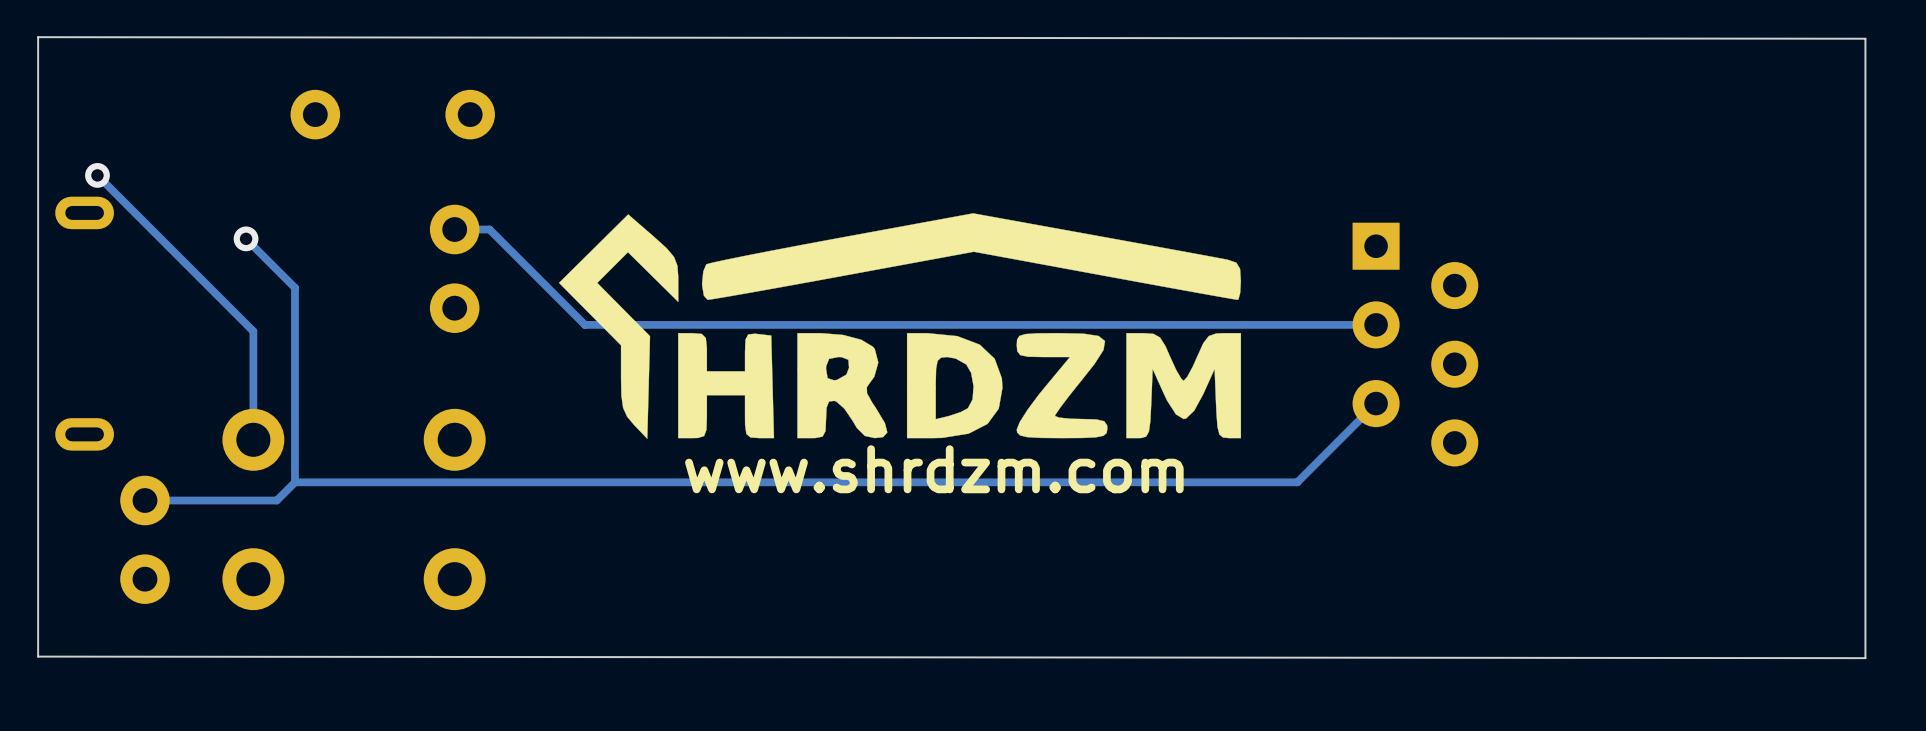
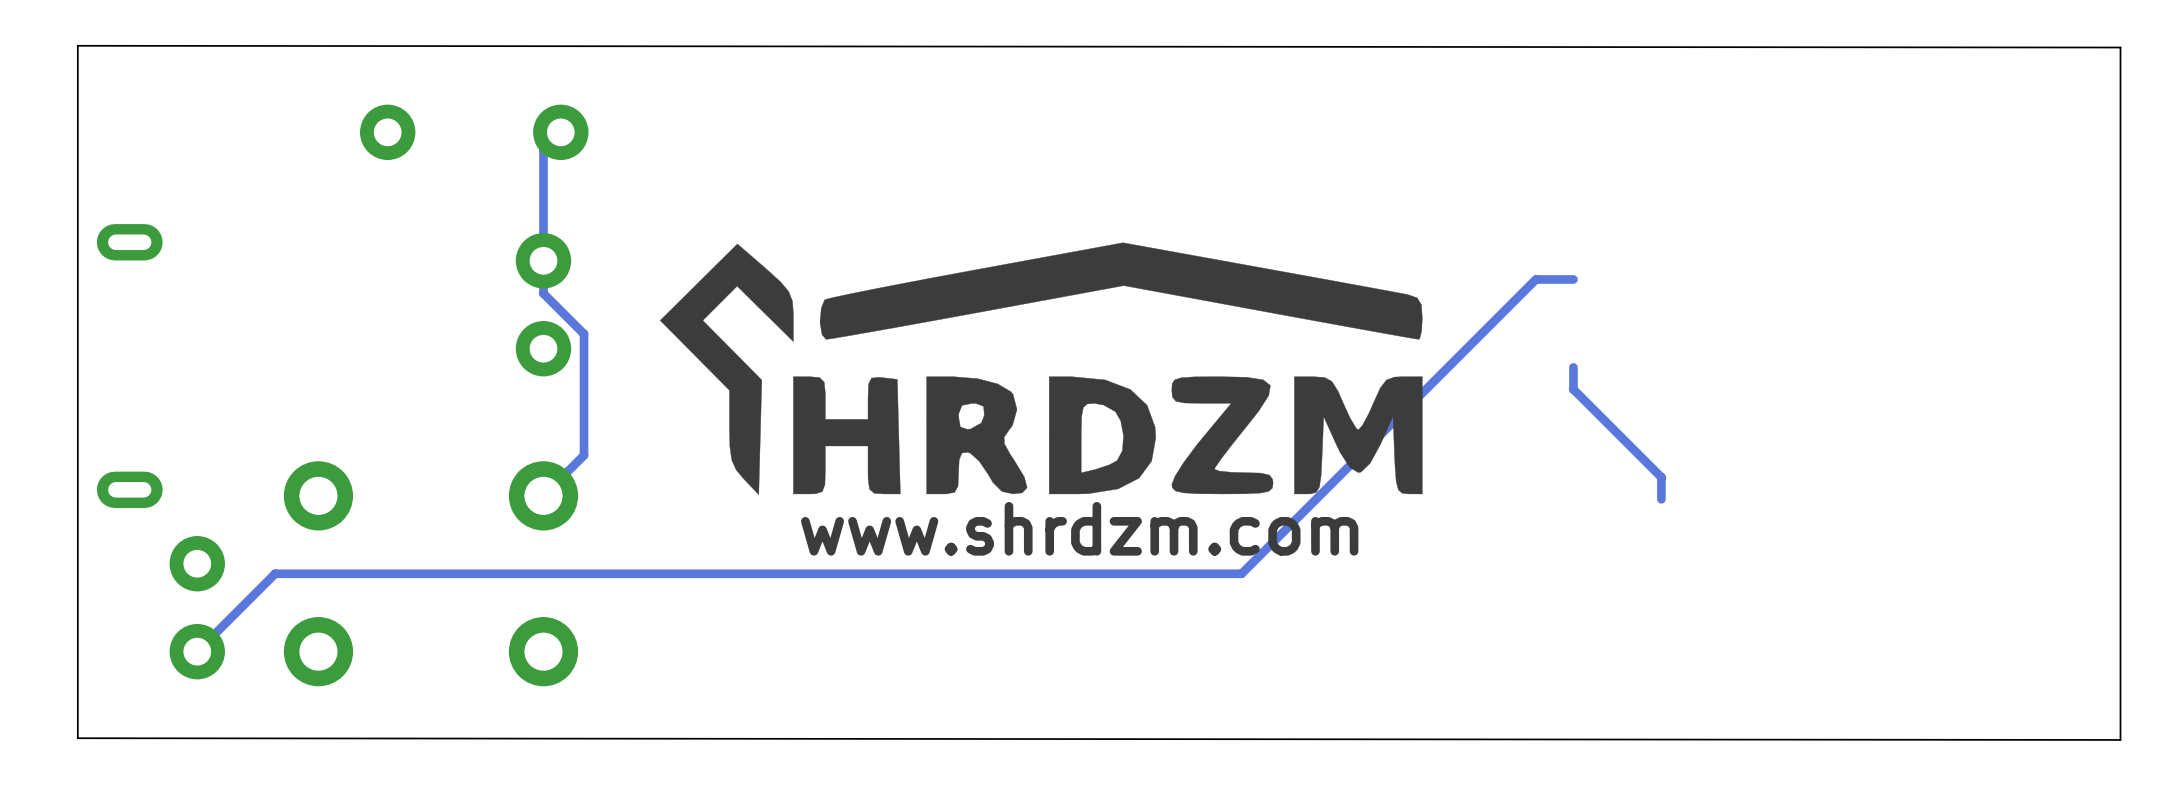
track: none -> (560, 132) (543, 149) (543, 293) (584, 334) (584, 455) (543, 495)
track: (97, 175) (253, 331) (253, 439) -> none
via: (97, 175) -> none
track: (454, 229) (489, 229) (584, 324) (1376, 324) -> (1661, 499) (1661, 477) (1573, 389) (1573, 367)
track: (246, 238) (294, 287) (294, 482) -> none
via: (246, 238) -> none
track: none -> (1573, 279) (1535, 279) (1241, 573) (275, 573) (197, 651)
part: (1415, 344) -> none
track: (1376, 403) (1297, 482) (294, 482) -> none
track: (294, 482) (276, 500) (144, 500) -> none

